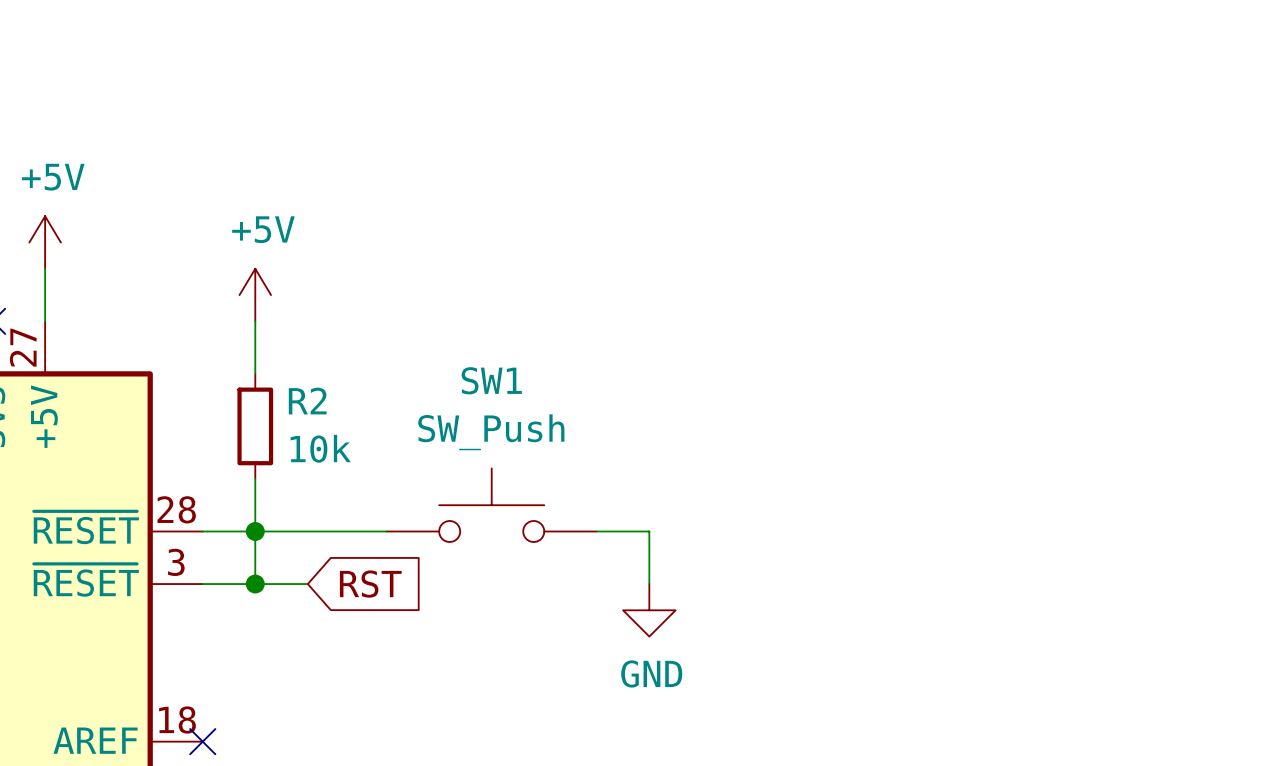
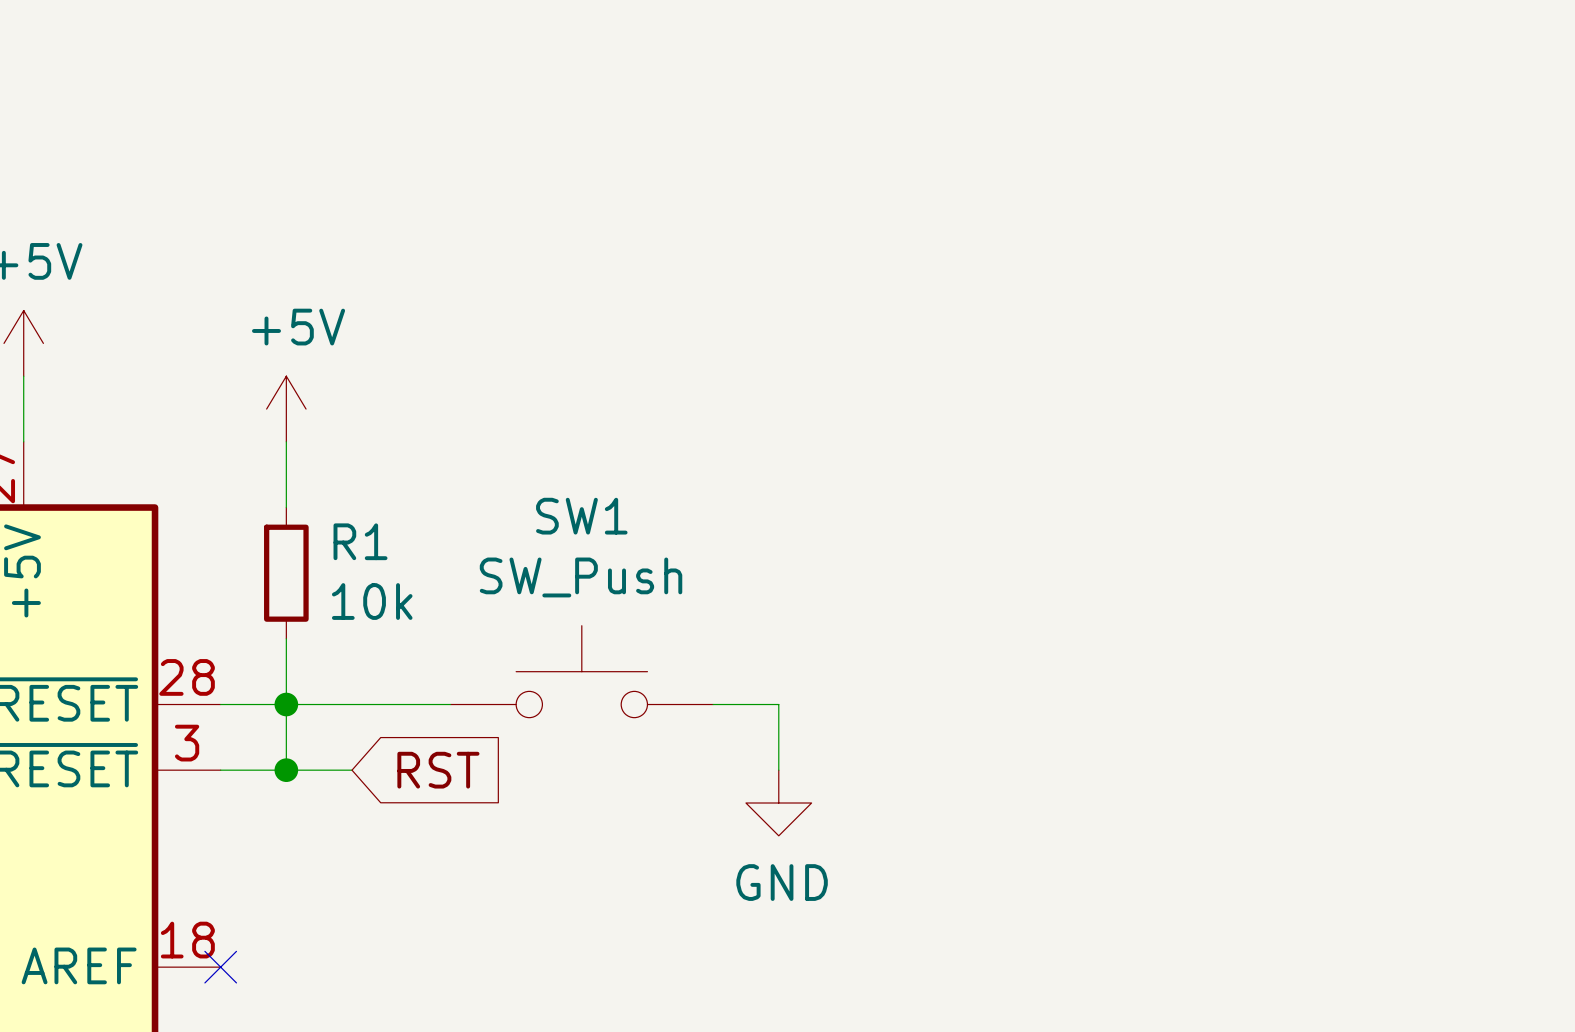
R2 name: R2 (307, 401) -> R1 (360, 541)

